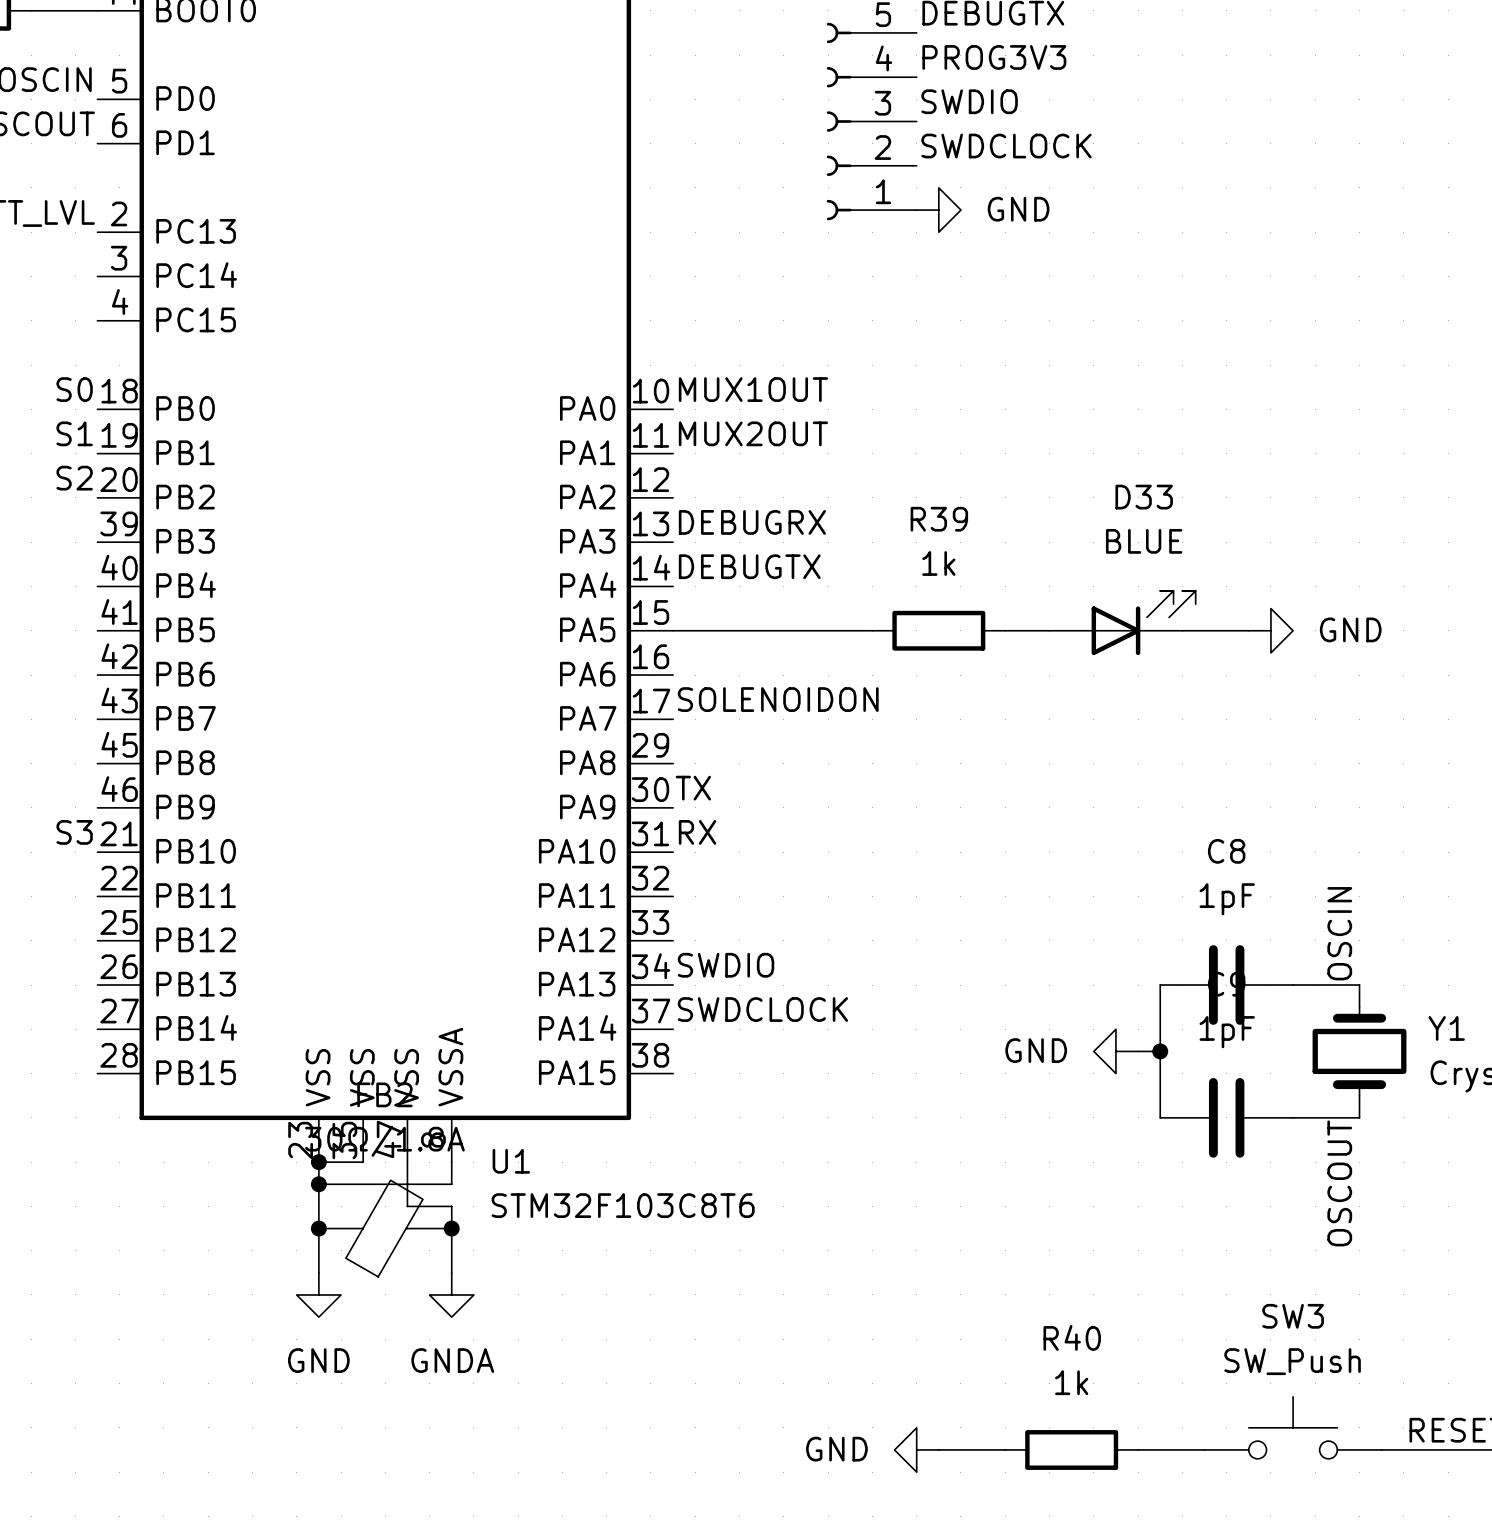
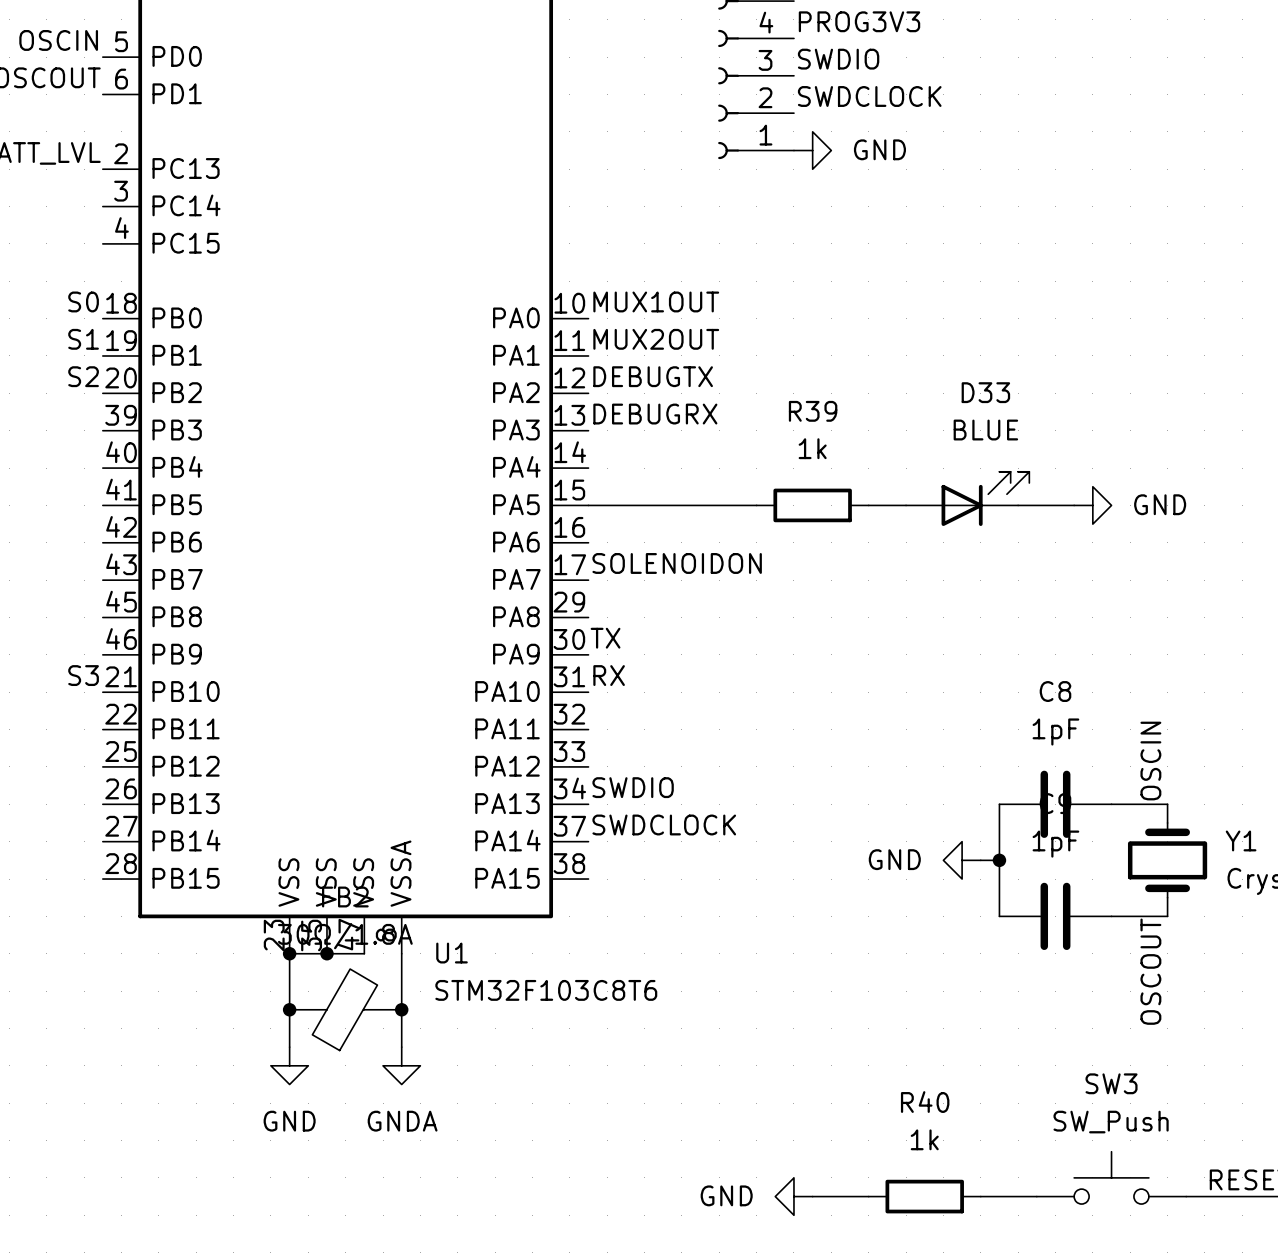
label position: DEBUGTX (749, 566) -> DEBUGTX (653, 376)
wire: none -> (326, 953) (364, 953)
wire: (407, 1162) (407, 1206) (451, 1206) -> (401, 972) (401, 991)
wire: (318, 1184) (451, 1184) -> none
junction position: (318, 1184) -> (326, 953)

